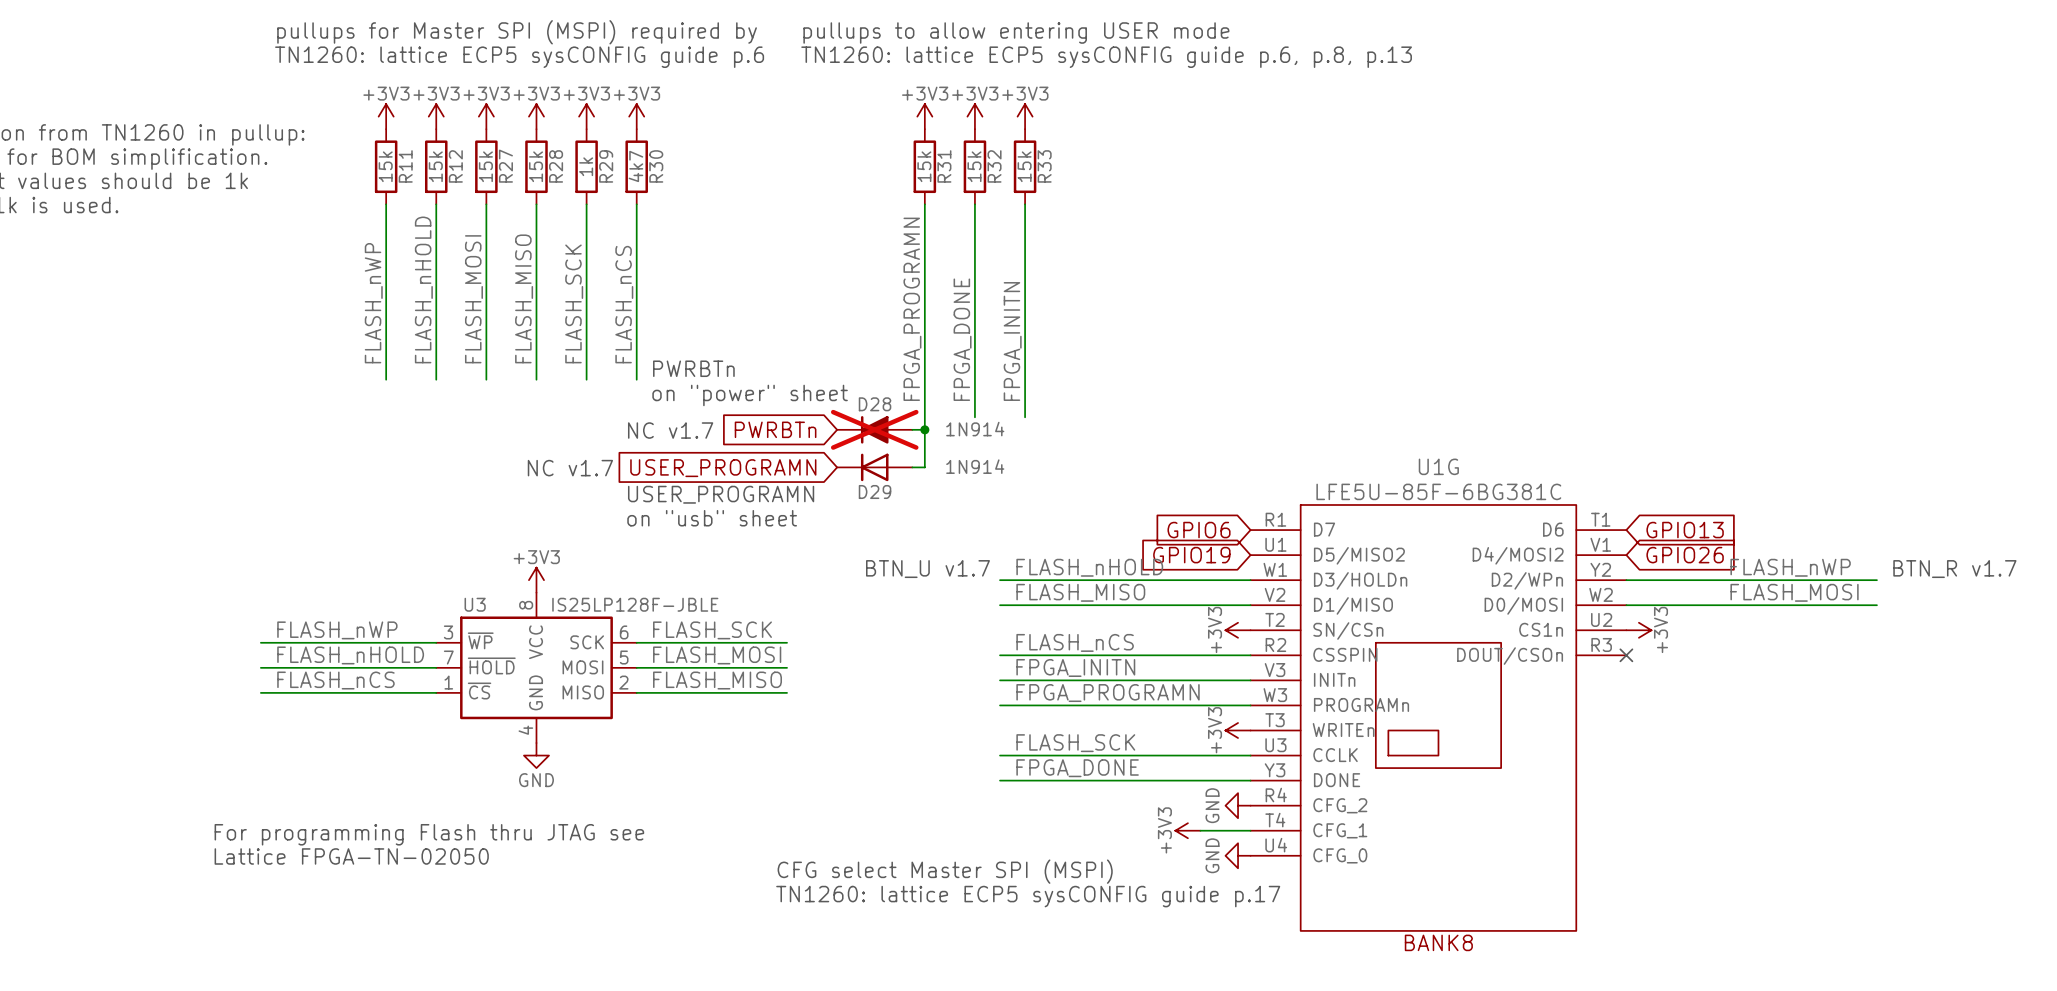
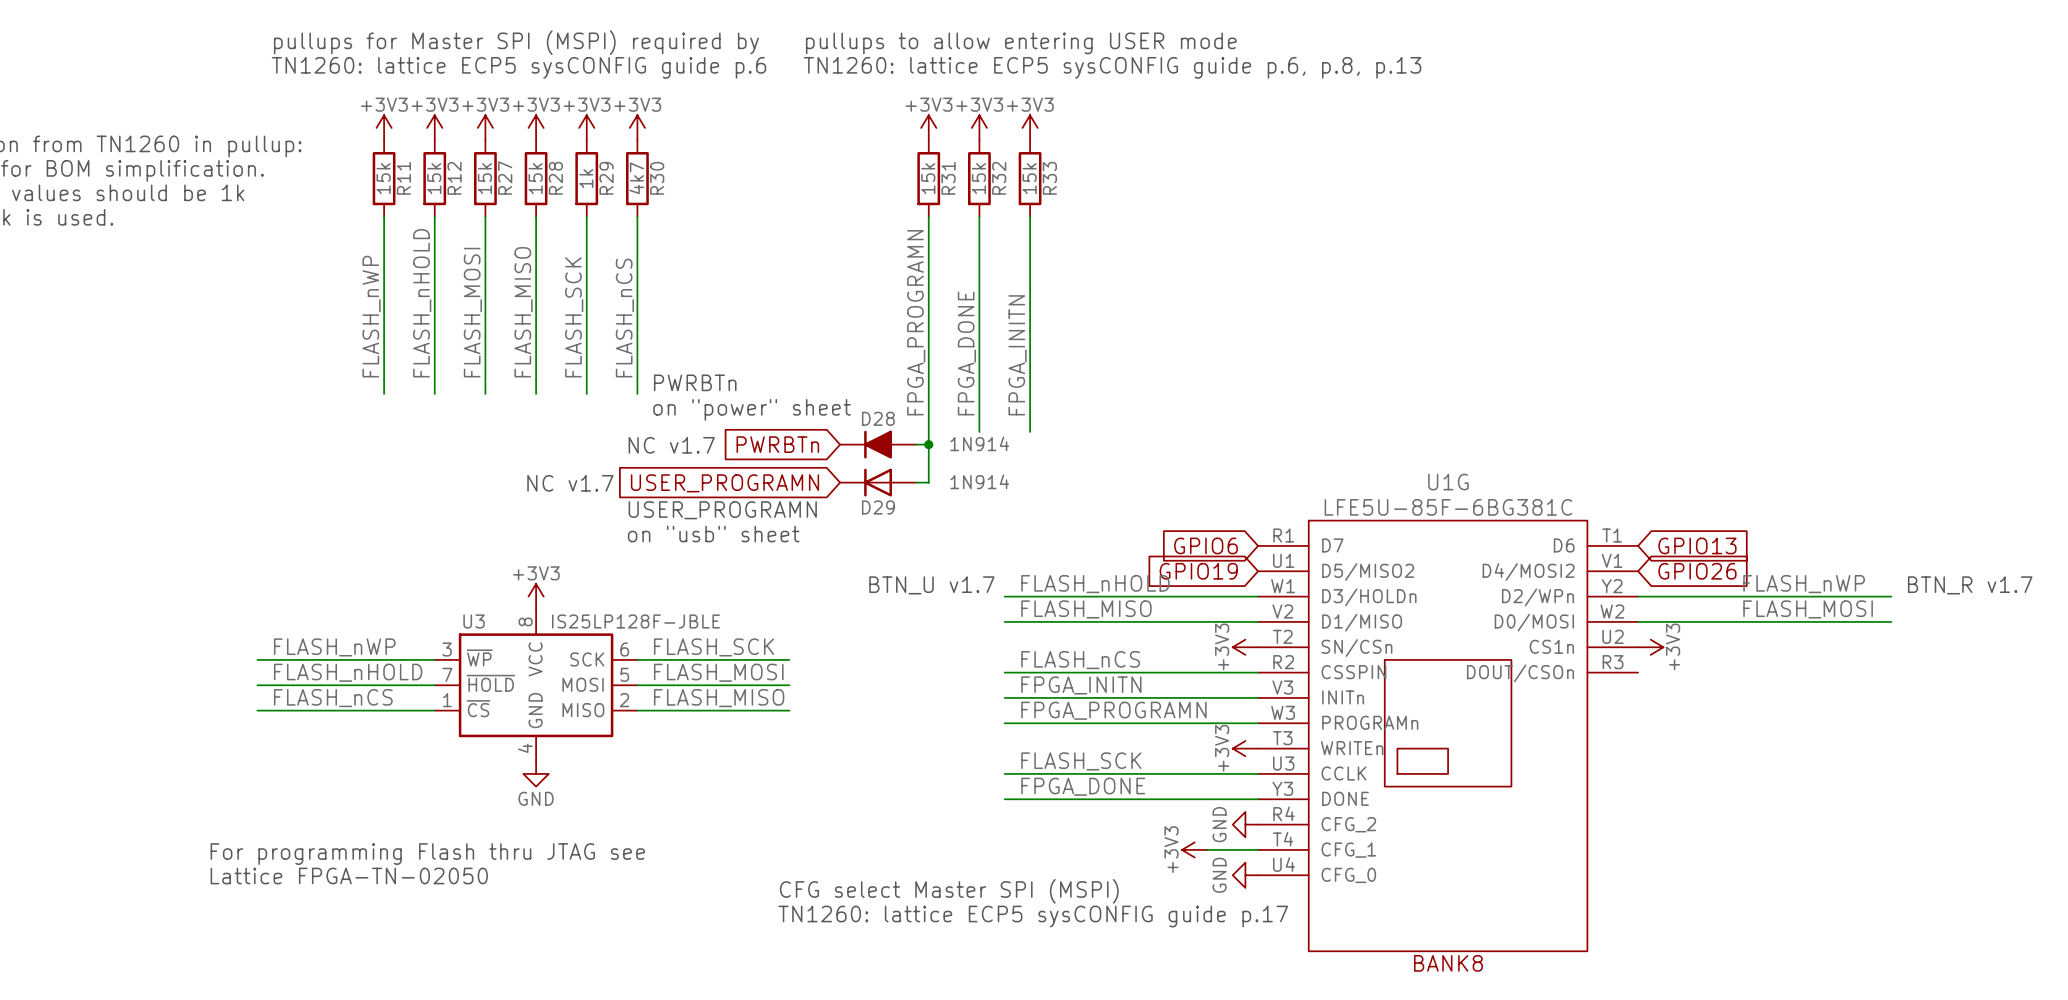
D28 do-not-place cross: (874, 429) -> none
no-connect mark: (1626, 655) -> none

